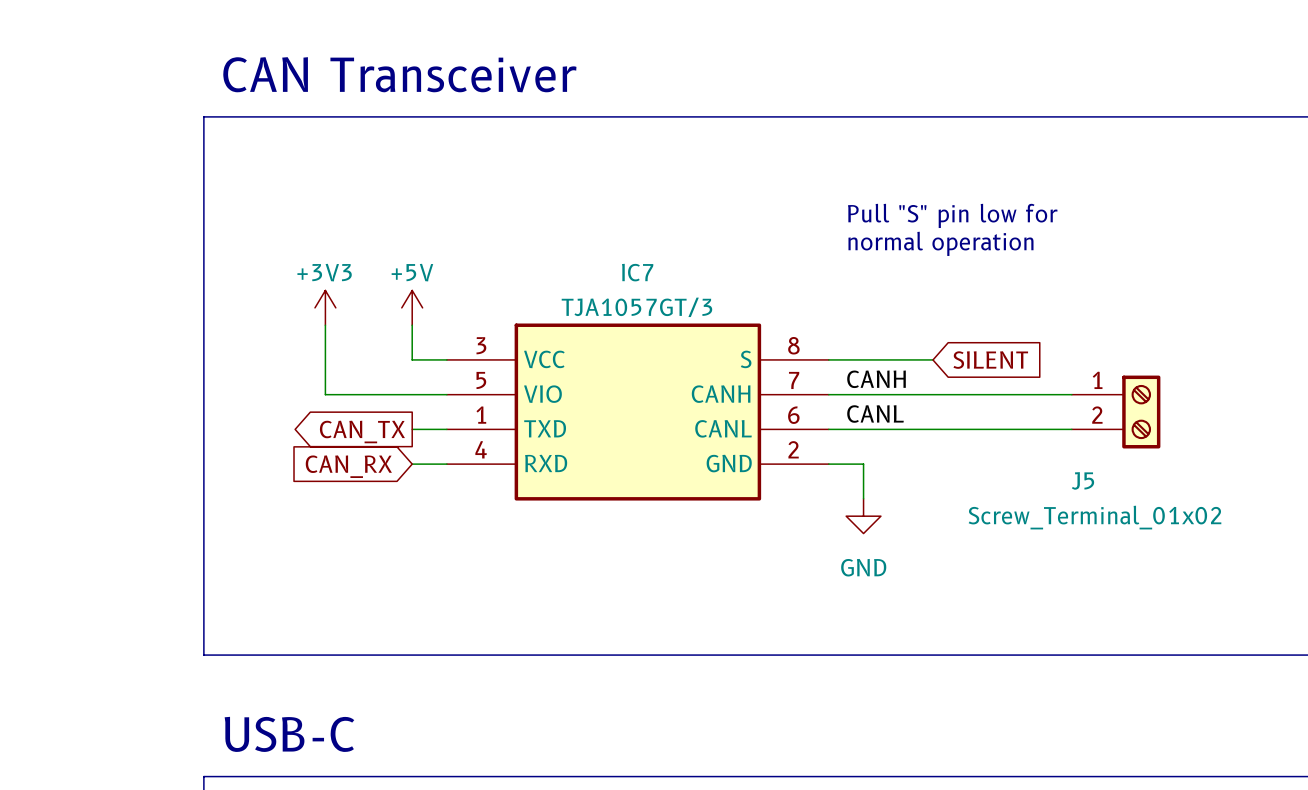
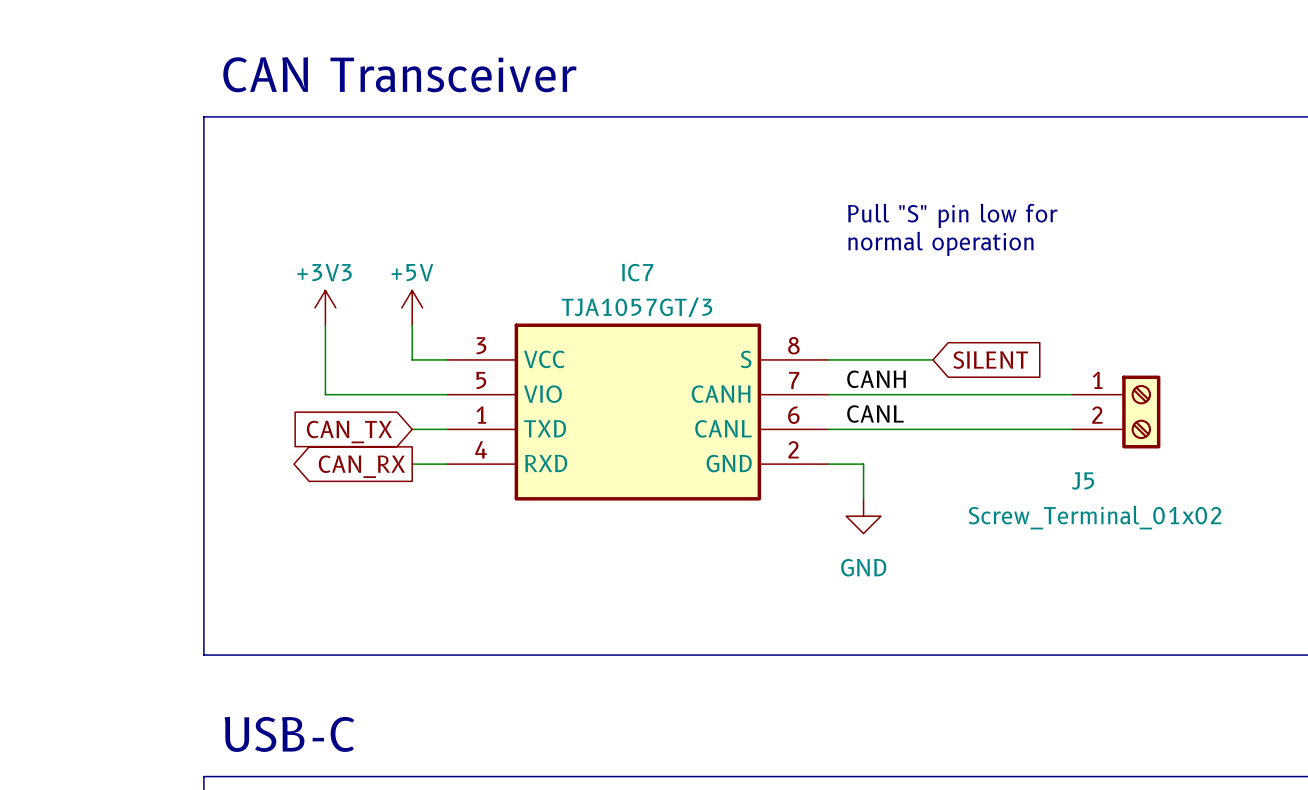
global label shape: output (362, 431) -> input (349, 431)
global label shape: input (348, 466) -> output (361, 466)

